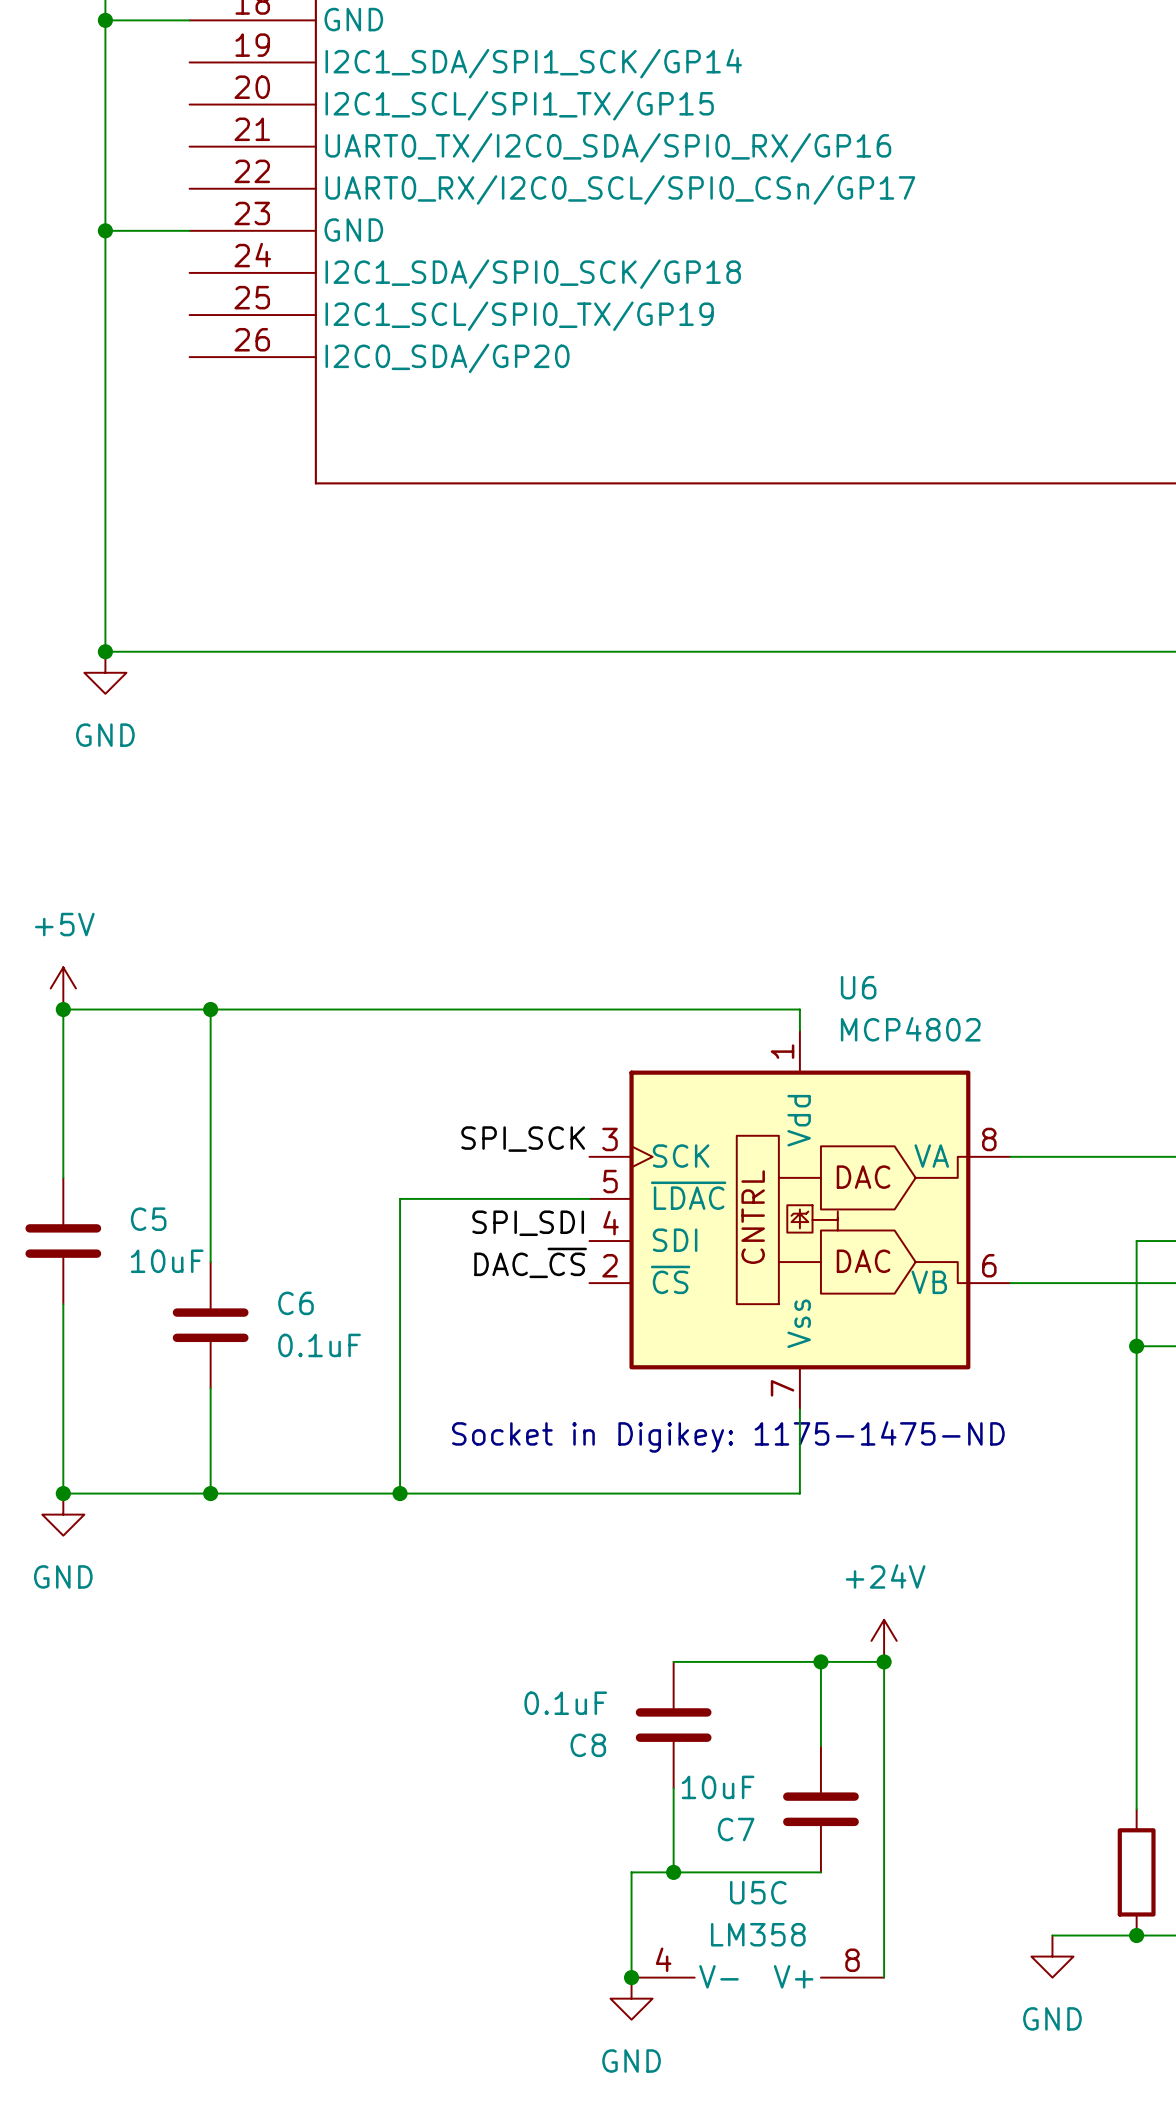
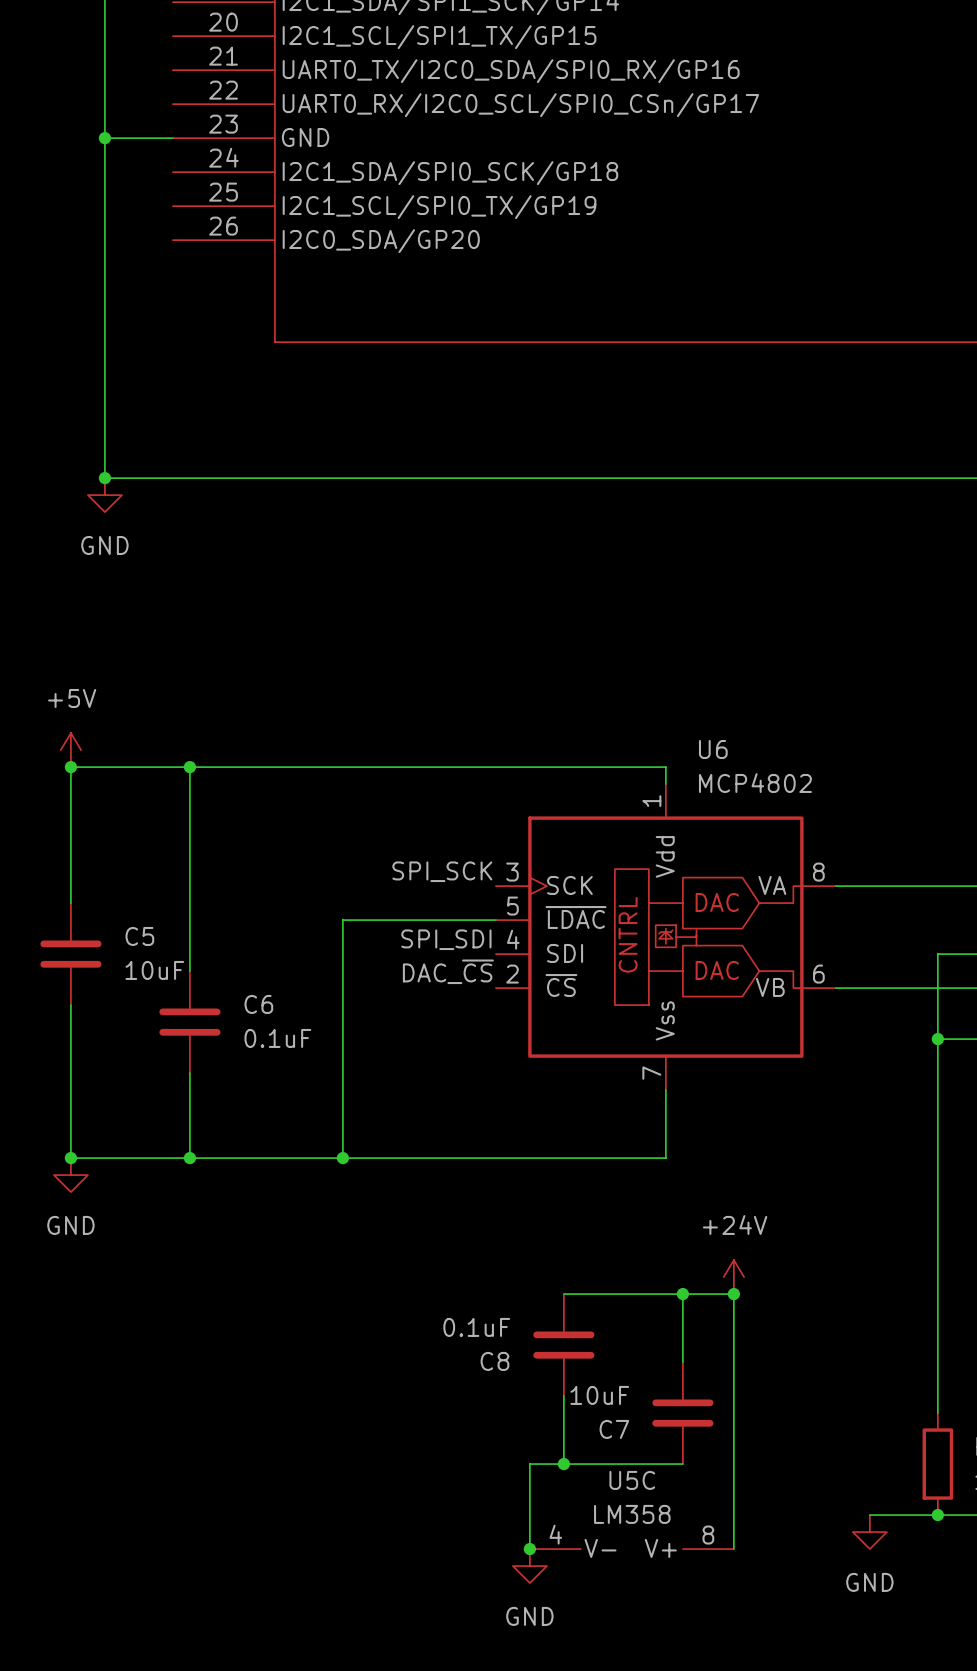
text: Socket in Digikey: 1175-1475-ND (728, 1436) -> none

